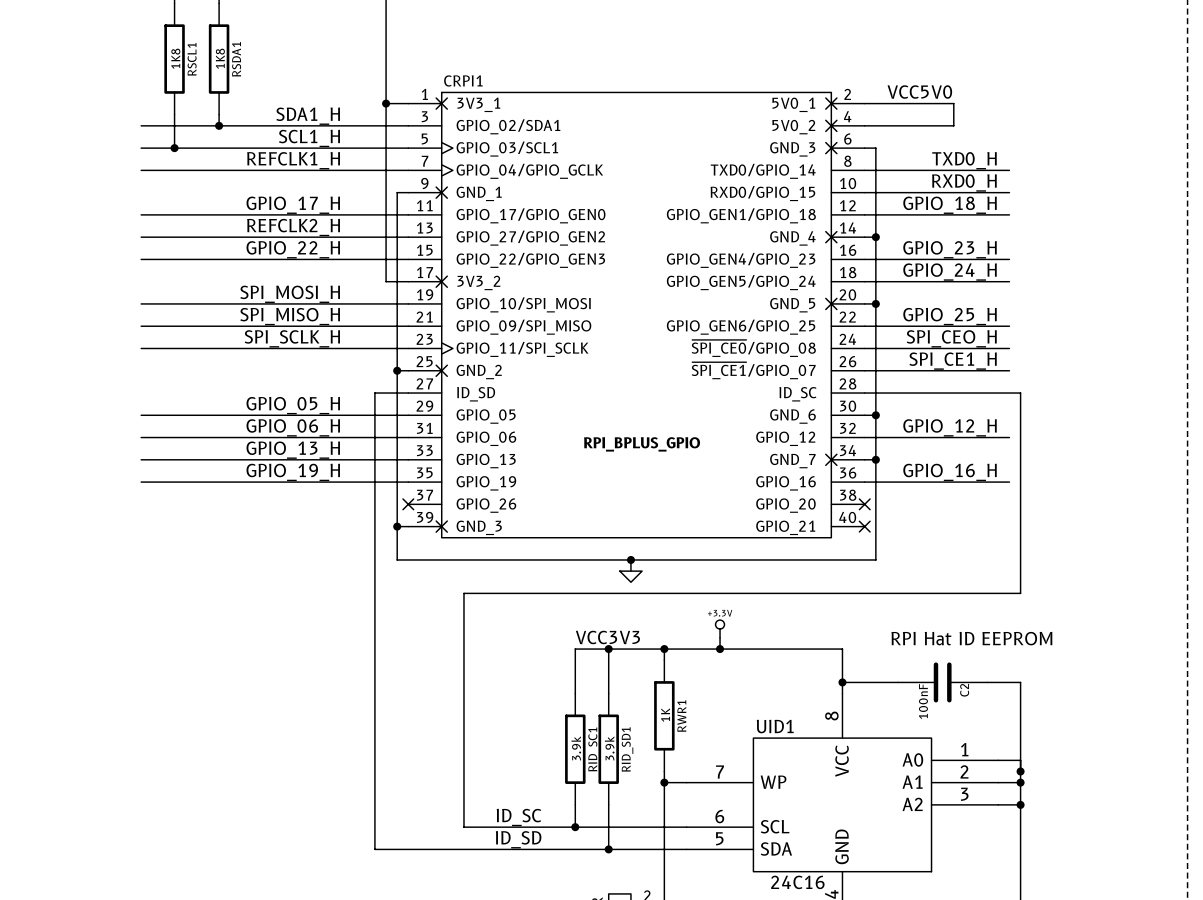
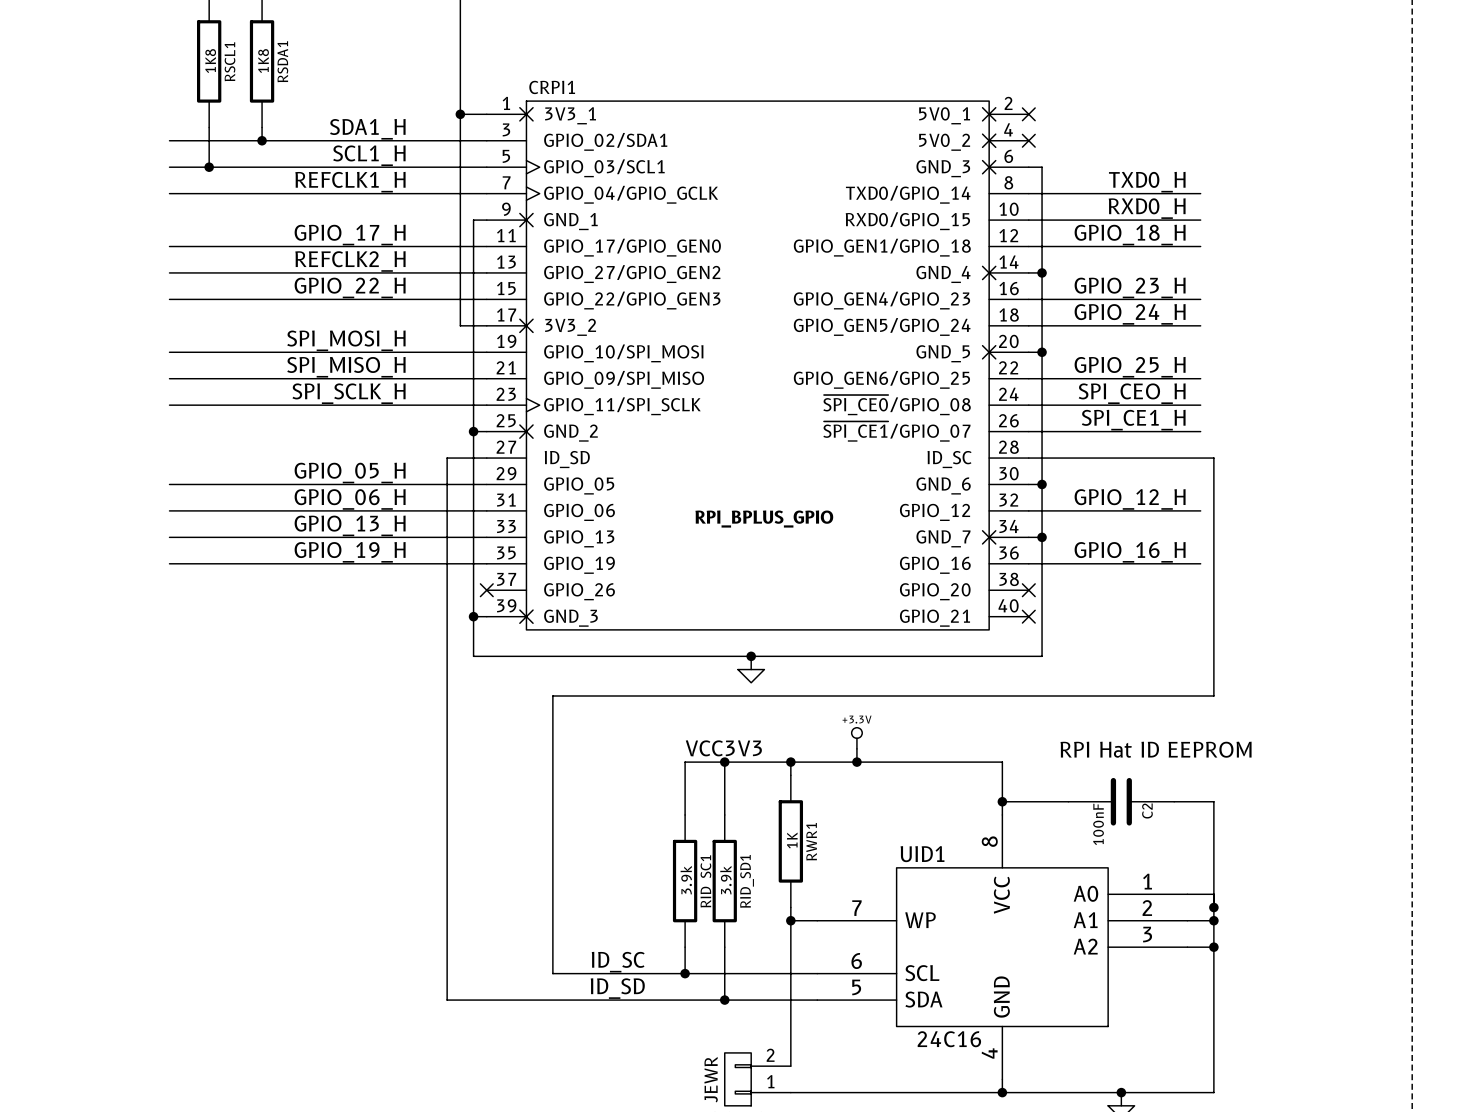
label: VCC5V0 (919, 92) -> none
wire: (864, 103) (953, 103) (953, 125) (864, 125) -> none
no-connect mark: none -> (1028, 114)
no-connect mark: none -> (1028, 140)

